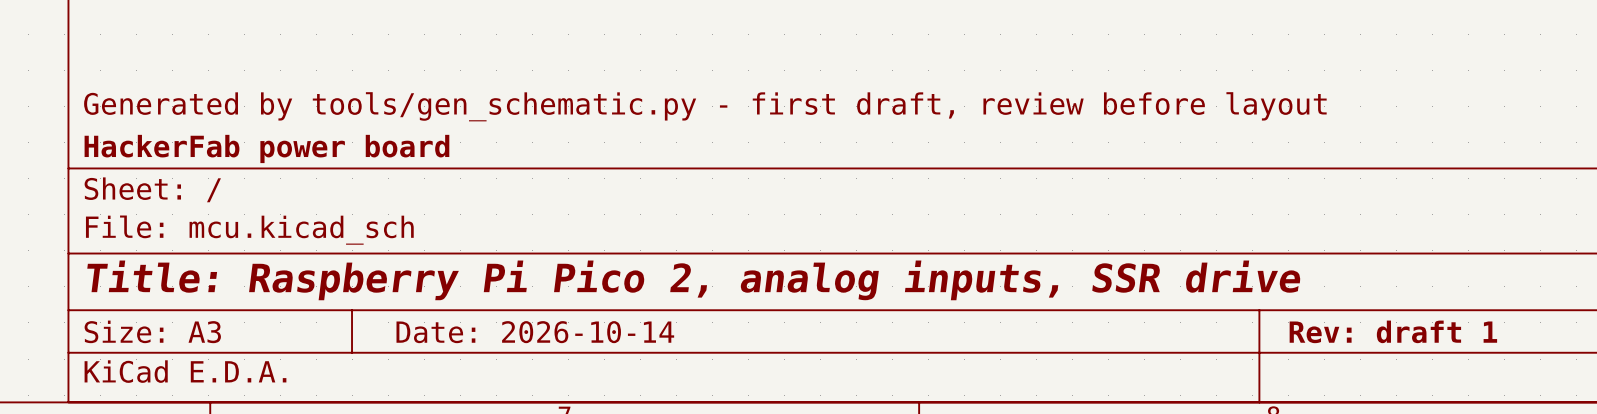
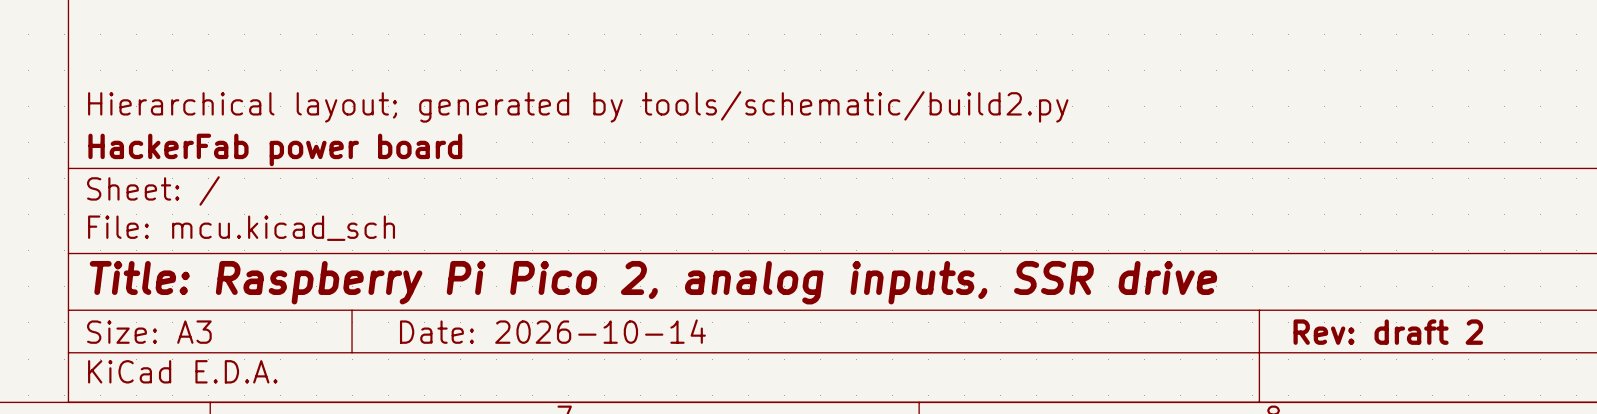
title block: Generated by tools/gen_schematic.py - first draft, review before layout (705, 106) -> Hierarchical layout; generated by tools/schematic/build2.py (578, 106)
title block: Rev: draft 1 (1393, 331) -> Rev: draft 2 (1388, 332)

